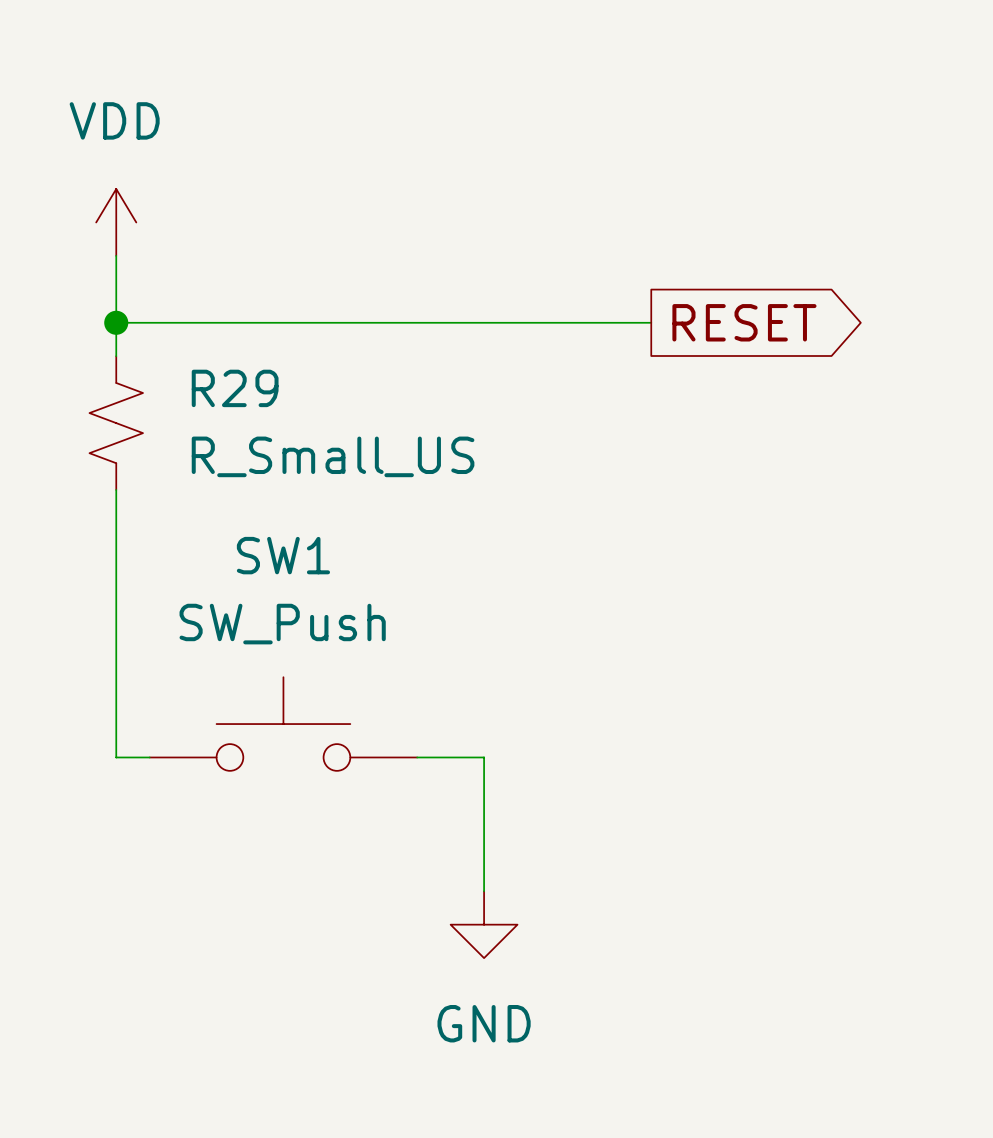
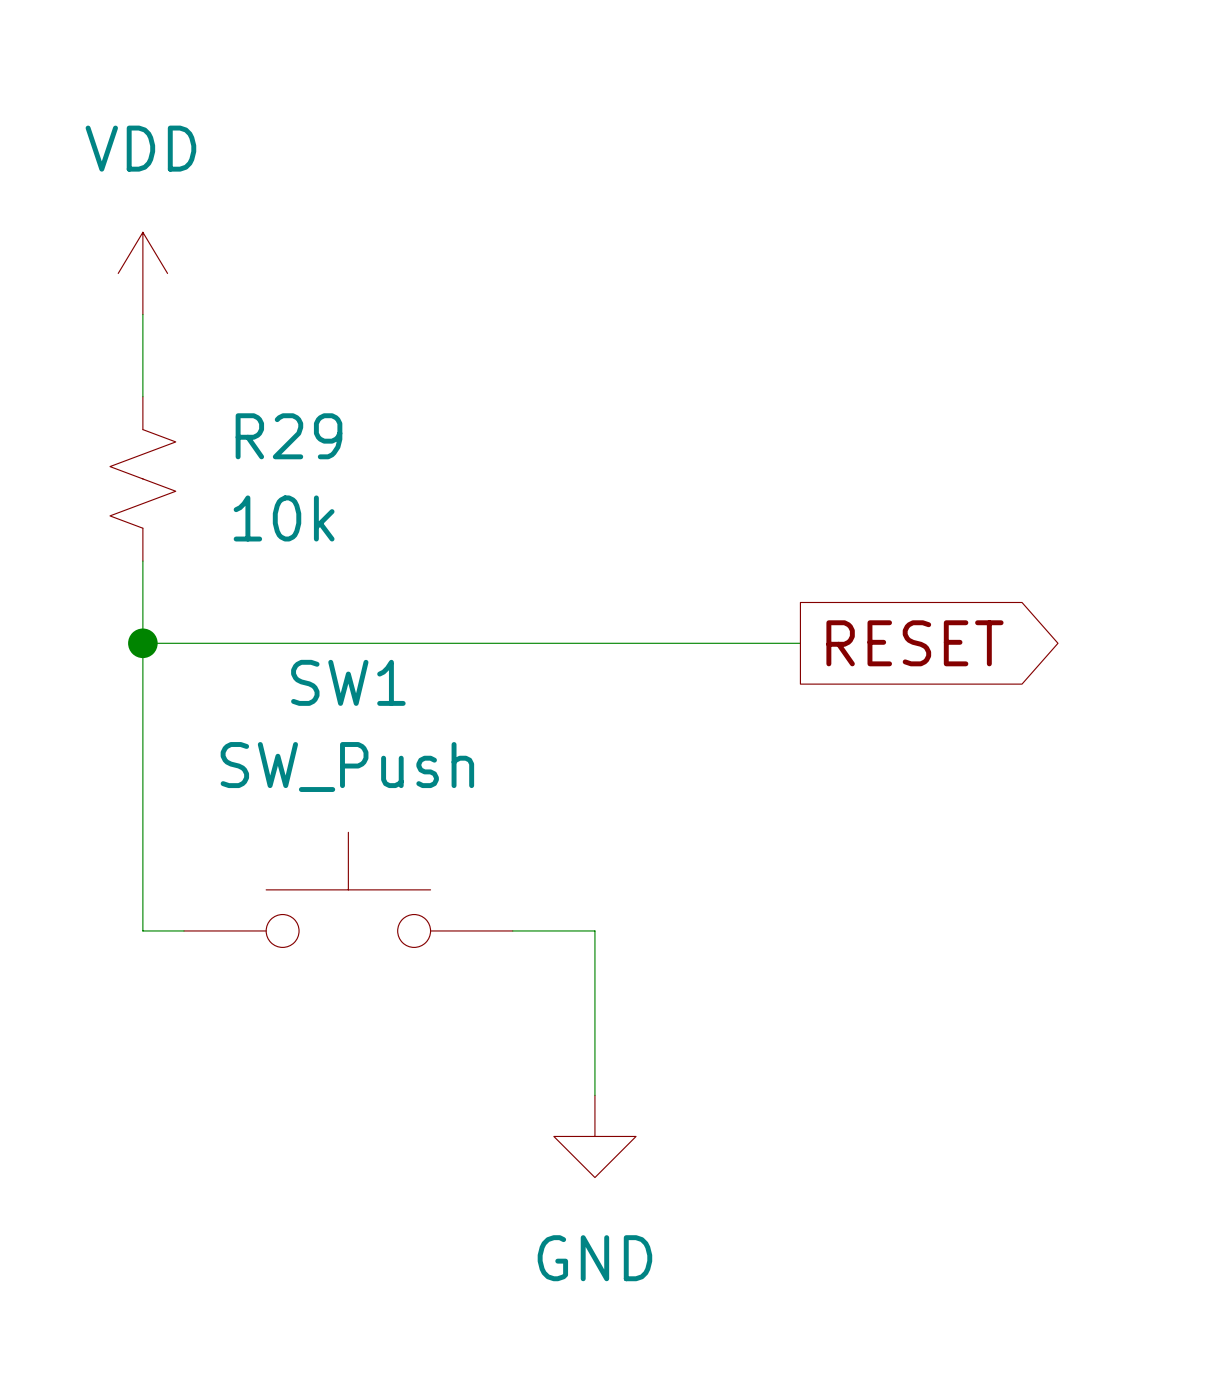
junction: (116, 322) -> none
wire: (651, 322) (116, 322) (116, 356) -> none
global label position: RESET (744, 322) -> RESET (914, 643)
R29 position: (116, 423) -> (142, 478)
R29 value: R_Small_US (333, 456) -> 10k (284, 518)
wire: none -> (142, 643) (800, 643)
junction: none -> (142, 643)

